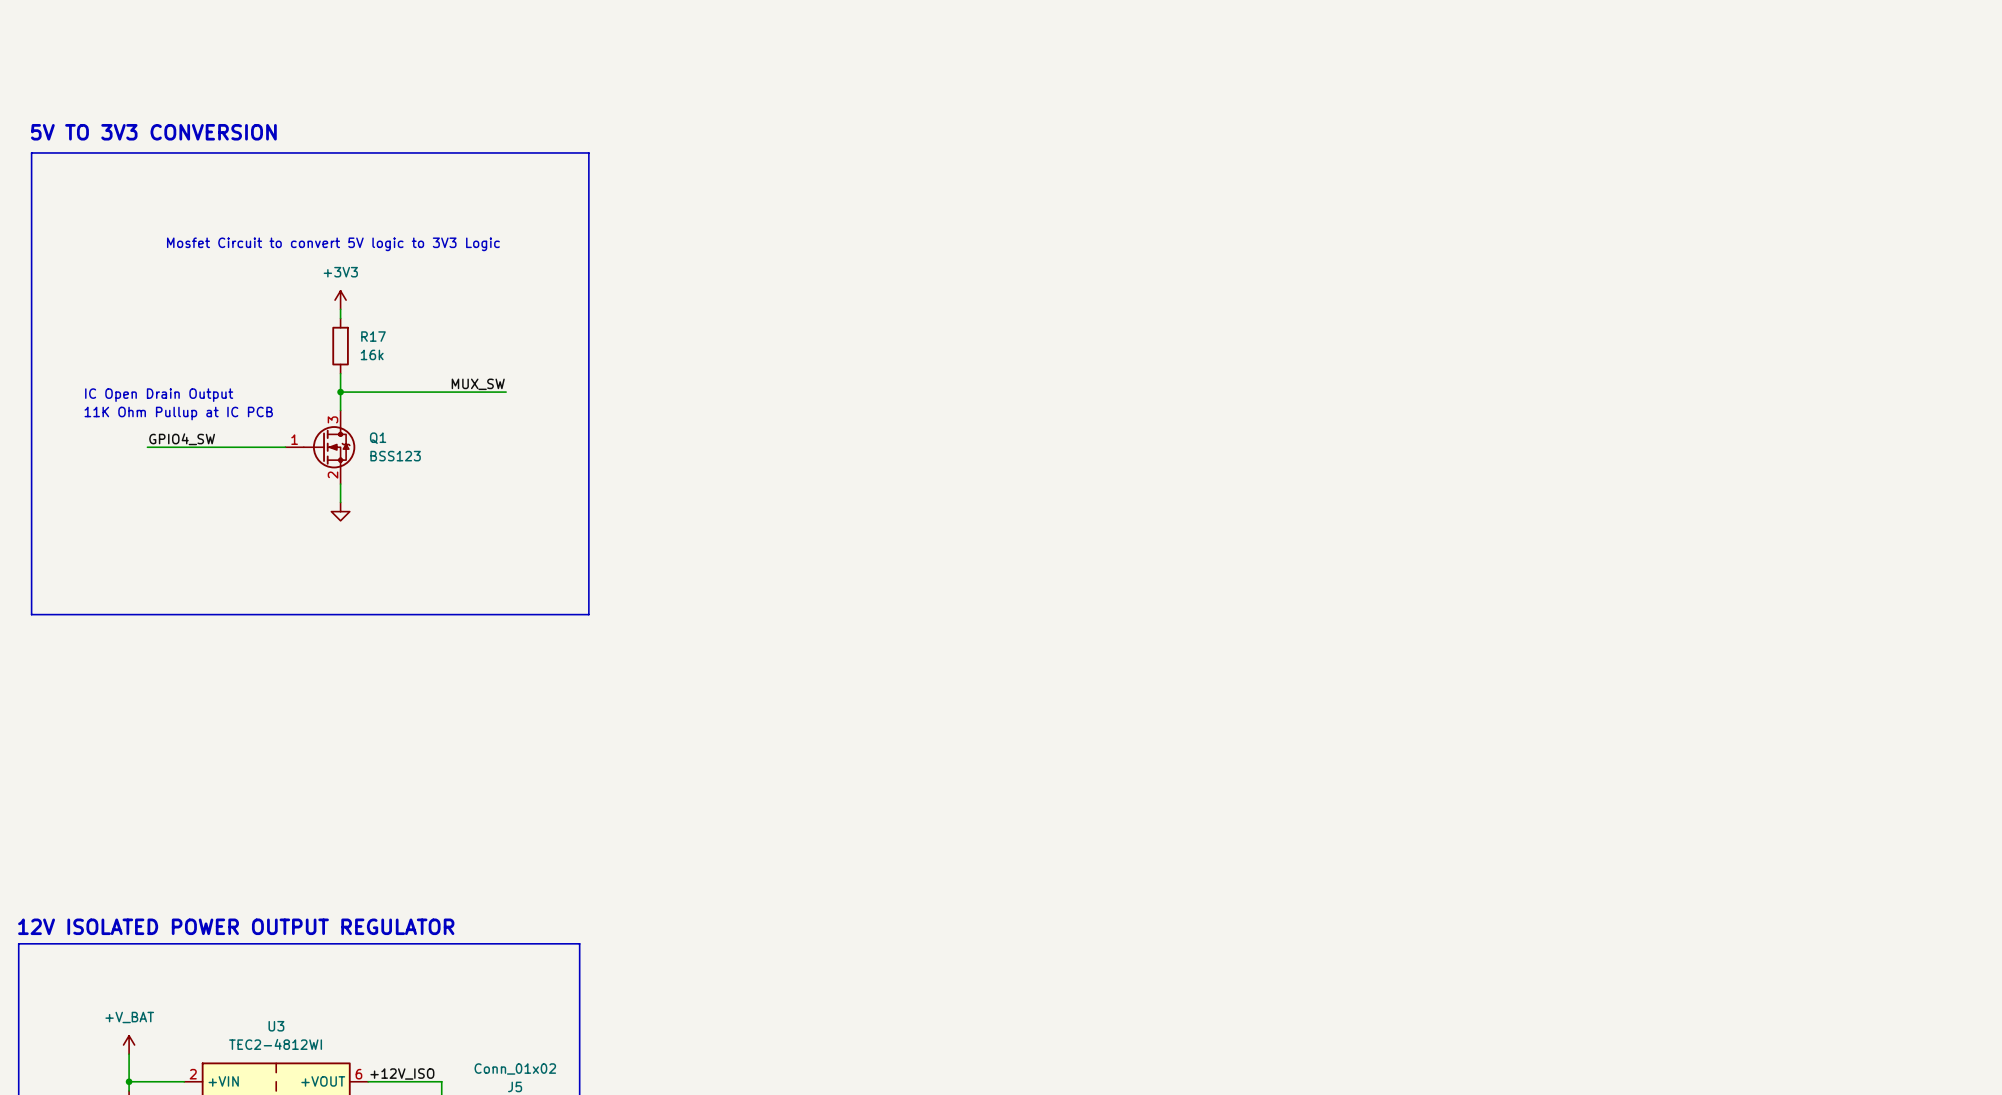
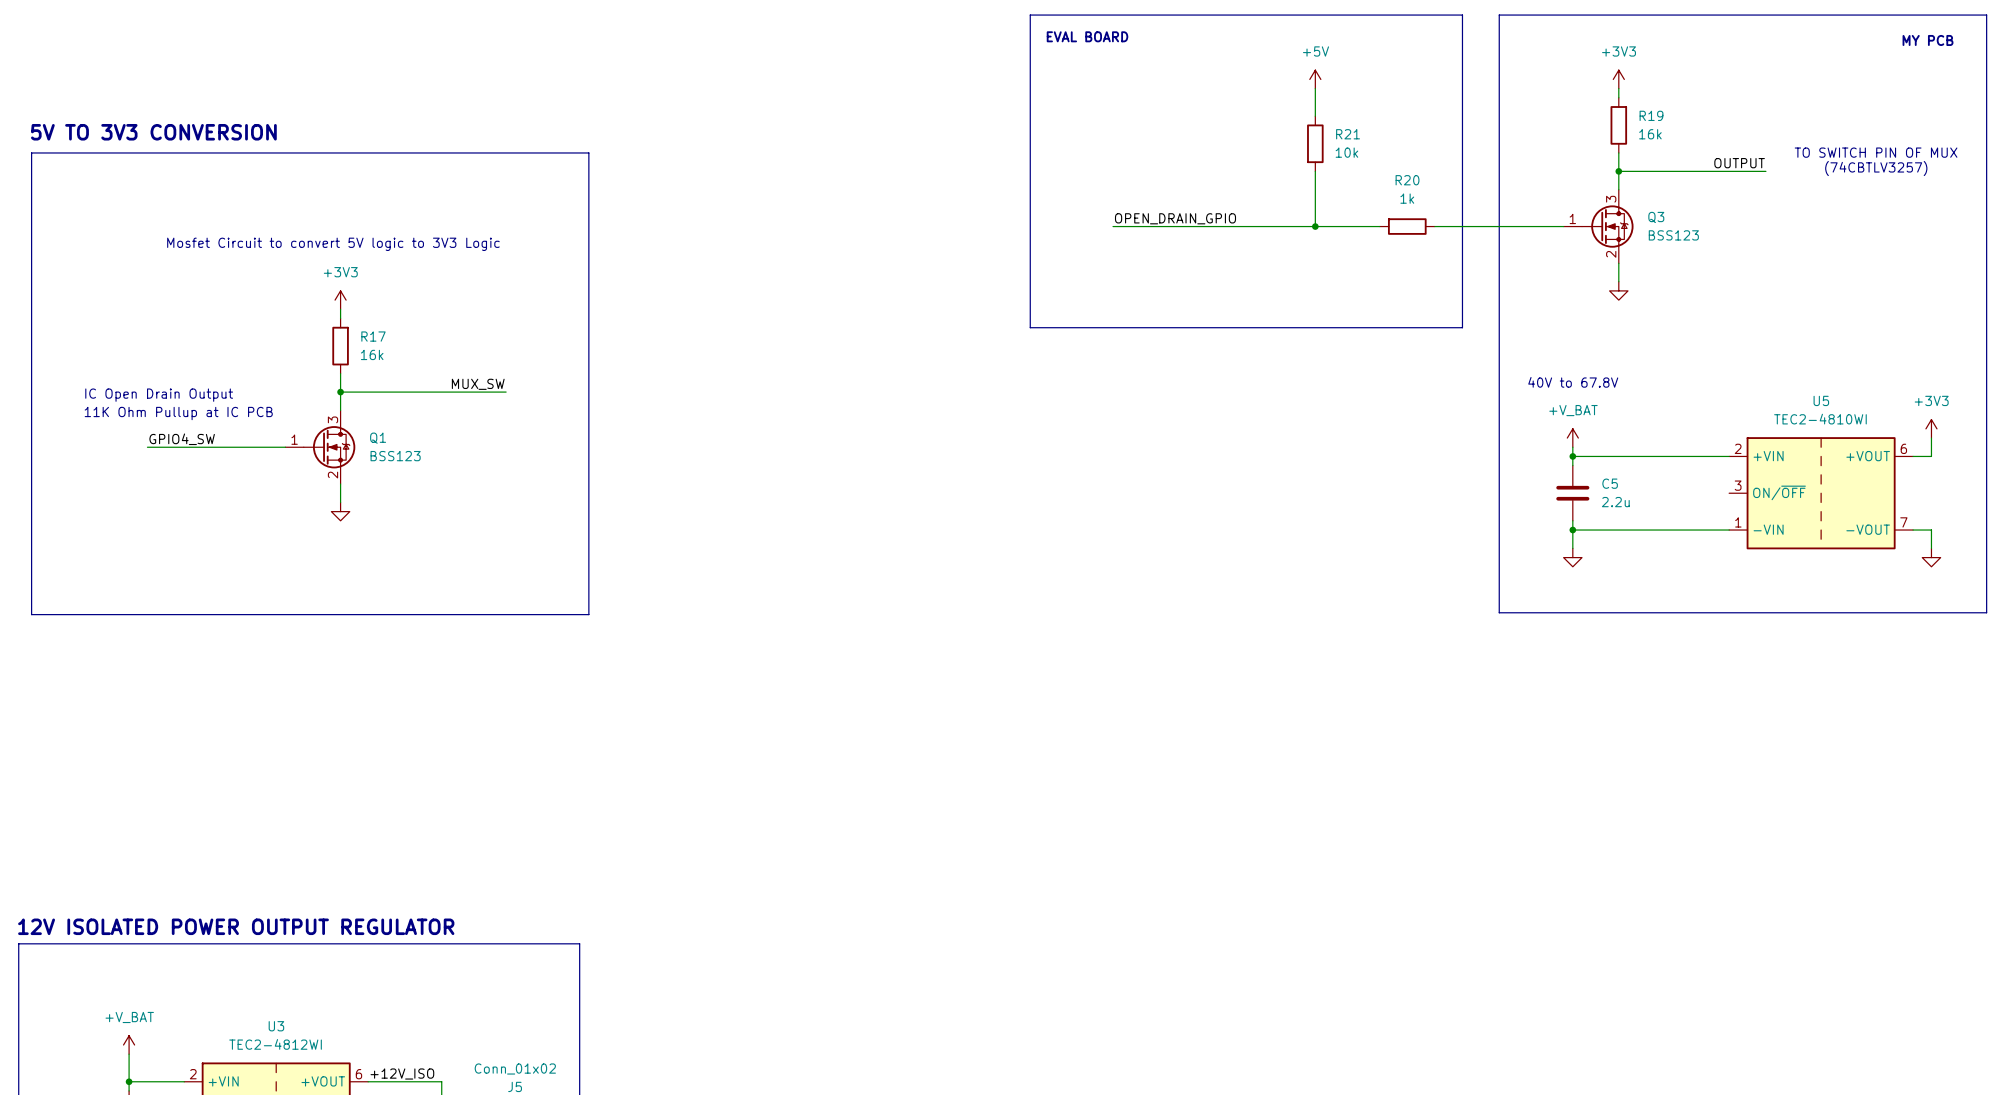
line: none -> (1030, 15) (1462, 15) (1462, 327) (1030, 327) (1030, 15)
line: none -> (1499, 15) (1986, 15) (1986, 612) (1499, 612) (1499, 15)
text: none -> EVAL BOARD (1087, 36)
text: none -> MY PCB (1928, 40)
power symbol: none -> +5V (1315, 79)
power symbol: none -> +3V3 (1618, 79)
wire: none -> (1315, 88) (1315, 116)
wire: none -> (1618, 88) (1618, 97)
R19: none -> 16k (1618, 125)
R21: none -> 10k (1315, 143)
wire: none -> (1618, 152) (1618, 189)
text: none -> TO SWITCH PIN OF MUX (1876, 152)
label: none -> OUTPUT (1739, 163)
text: none -> (74CBTLV3257) (1876, 168)
wire: none -> (1315, 171) (1315, 226)
wire: none -> (1618, 171) (1765, 171)
junction: none -> (1618, 171)
label: none -> OPEN_DRAIN_GPIO (1175, 218)
wire: none -> (1113, 226) (1379, 226)
junction: none -> (1315, 226)
R20: none -> 1k (1407, 226)
wire: none -> (1434, 226) (1563, 226)
Q3: none -> BSS123 (1598, 226)
wire: none -> (1618, 263) (1618, 281)
power symbol: none -> (1618, 290)
text: none -> 40V to 67.8V (1573, 382)
power symbol: none -> +3V3 (1931, 428)
power symbol: none -> +V_BAT (1572, 438)
wire: none -> (1931, 438) (1931, 456) (1913, 456)
wire: none -> (1572, 447) (1572, 465)
wire: none -> (1572, 456) (1729, 456)
junction: none -> (1572, 456)
C5: none -> 2.2u (1572, 493)
U5: none -> TEC2-4810WI (1821, 493)
wire: none -> (1572, 520) (1572, 548)
wire: none -> (1572, 530) (1729, 530)
junction: none -> (1572, 530)
wire: none -> (1913, 530) (1931, 530) (1931, 548)
power symbol: none -> (1572, 557)
power symbol: none -> (1931, 557)

